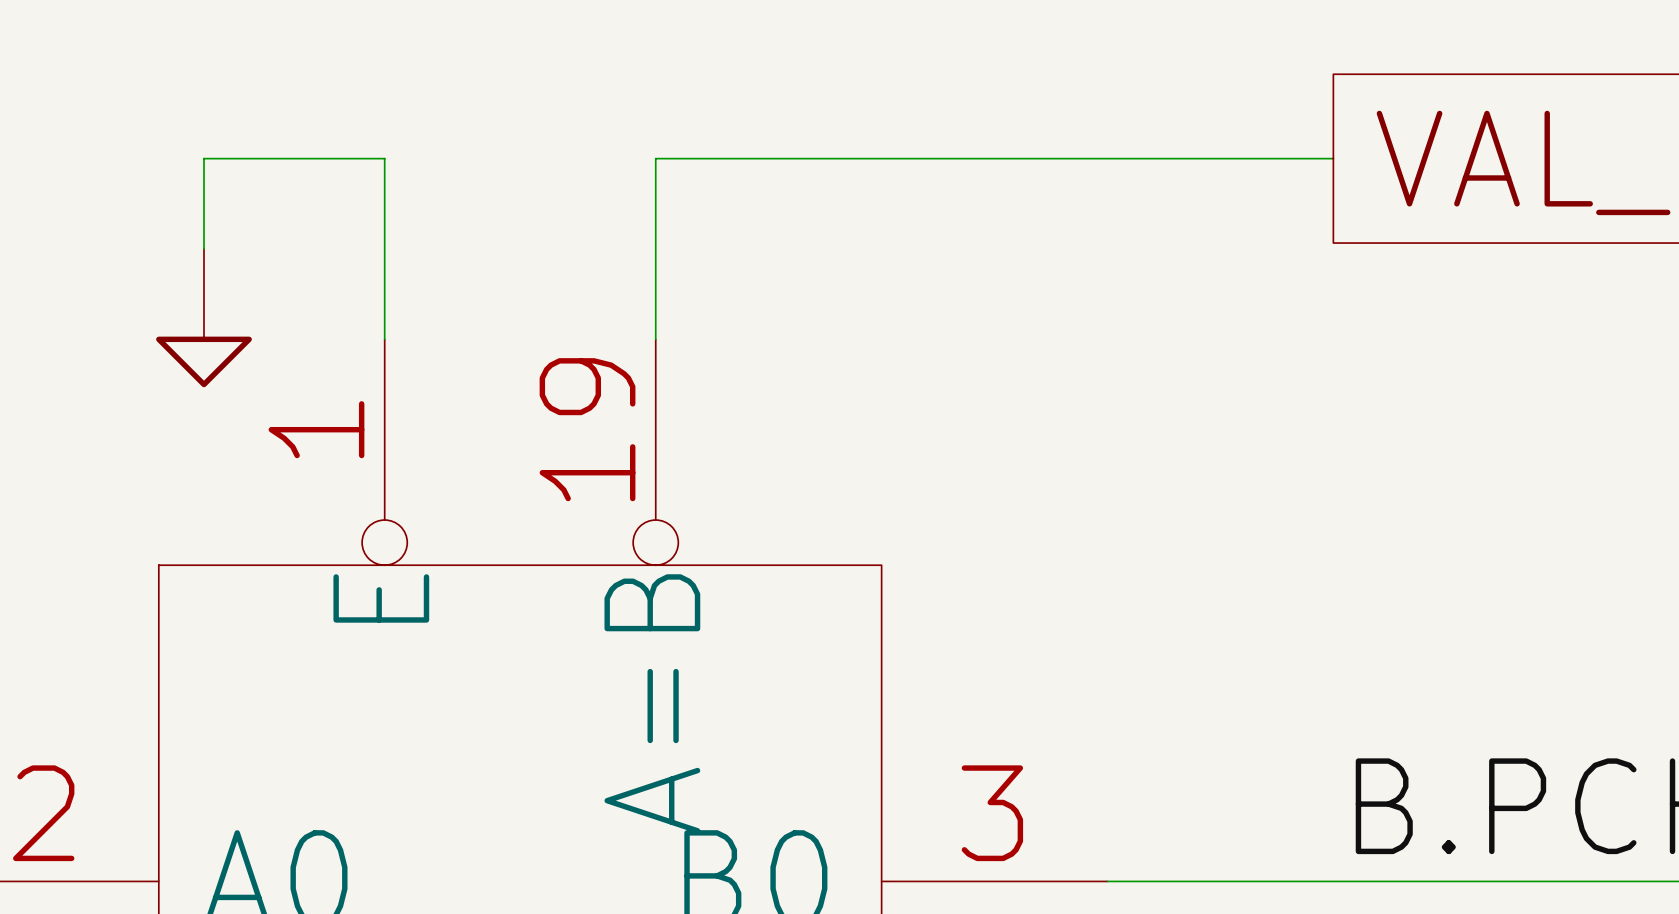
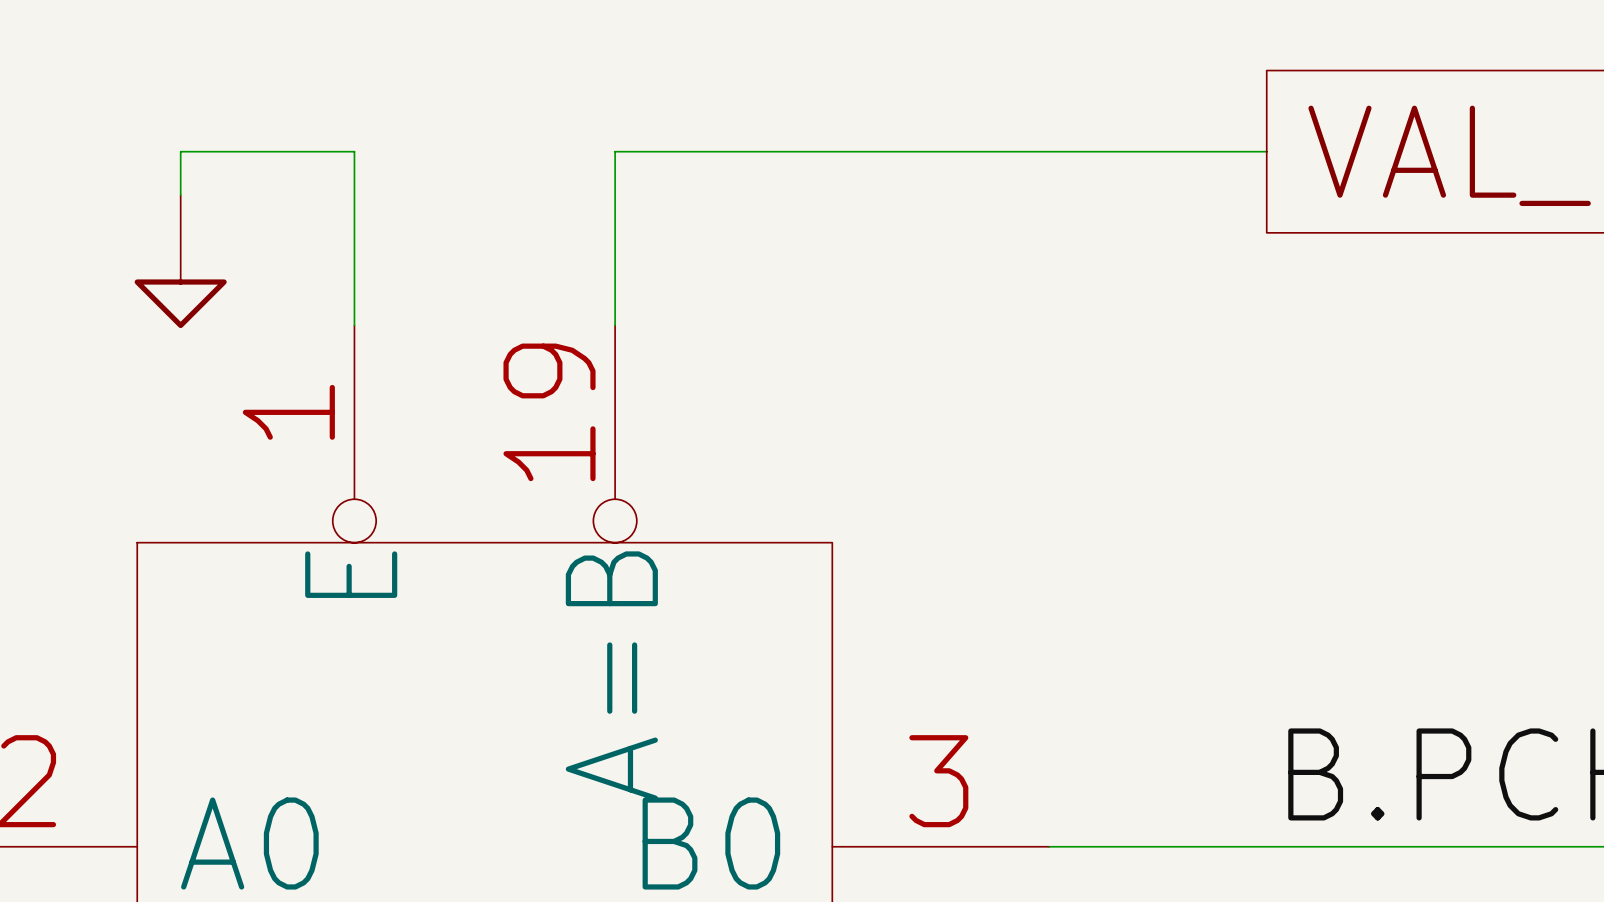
power symbol position: (203, 318) -> (180, 261)

